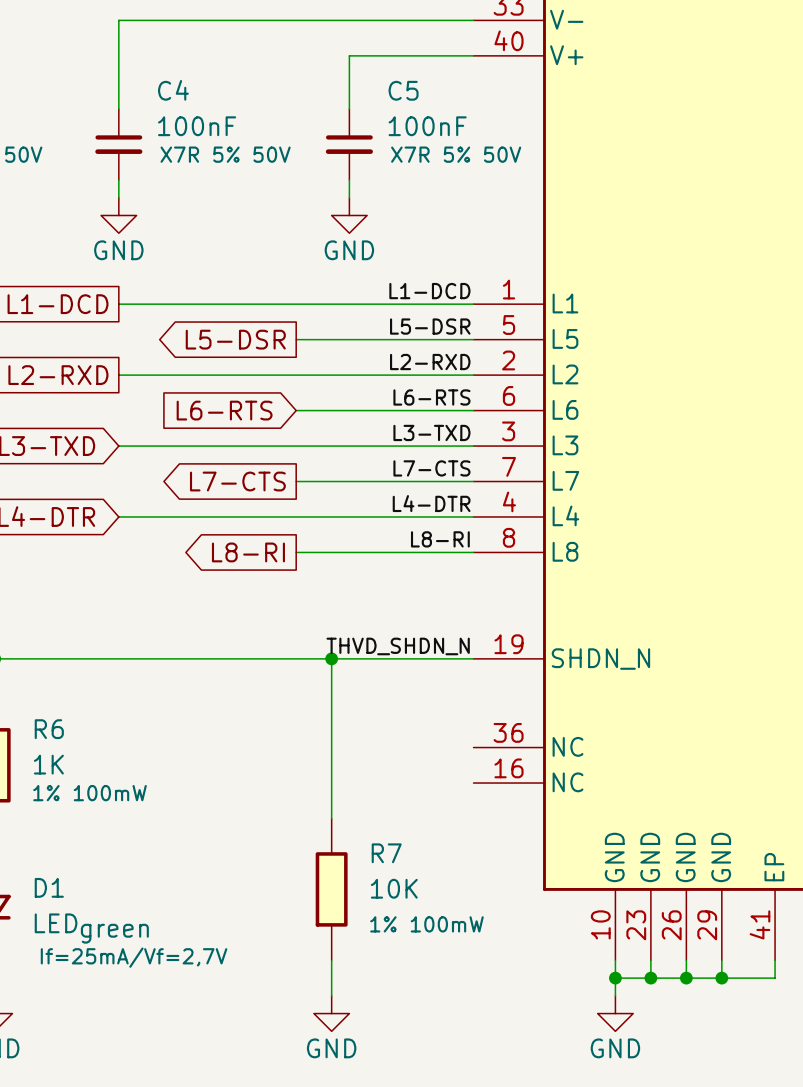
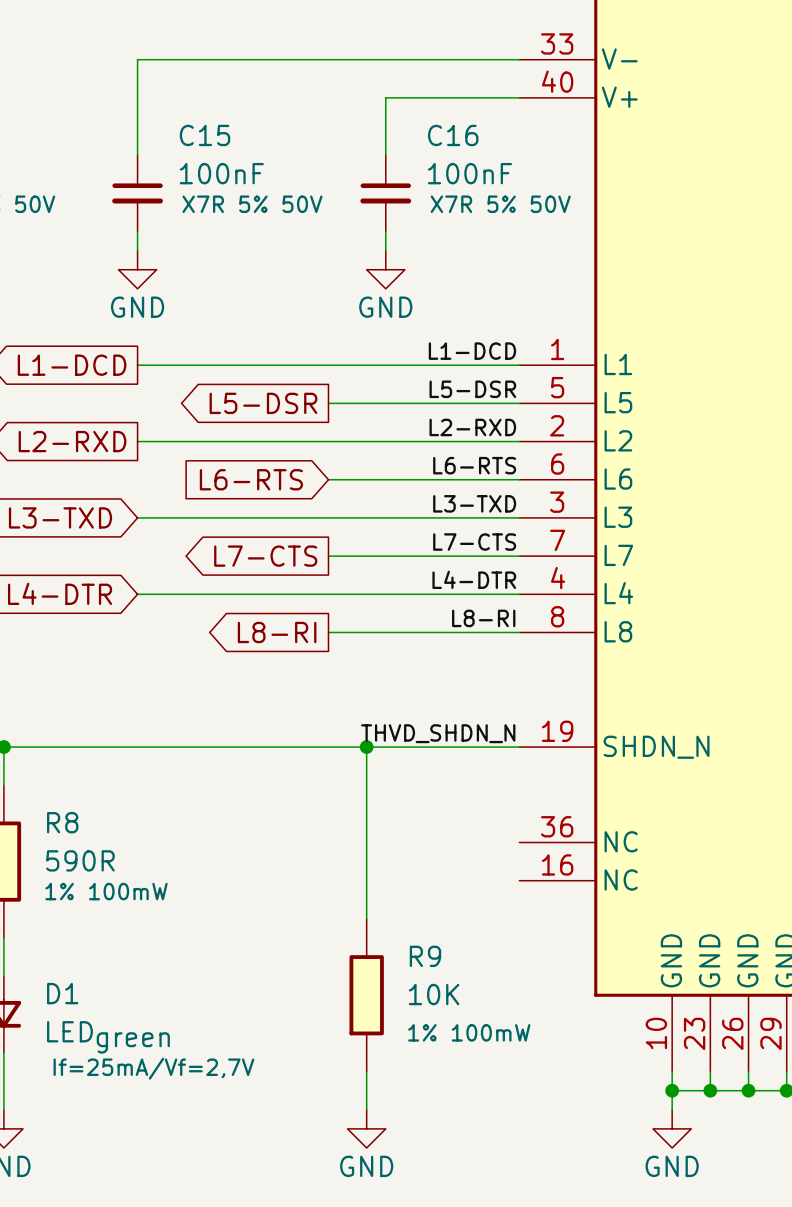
C4 name: C4 (173, 90) -> C15 (204, 135)
C5 name: C5 (403, 90) -> C16 (453, 135)
R6 name: R6 (49, 729) -> R8 (62, 822)
R6 value: 1K (48, 764) -> 590R (80, 860)
R7 name: R7 (386, 853) -> R9 (425, 956)

